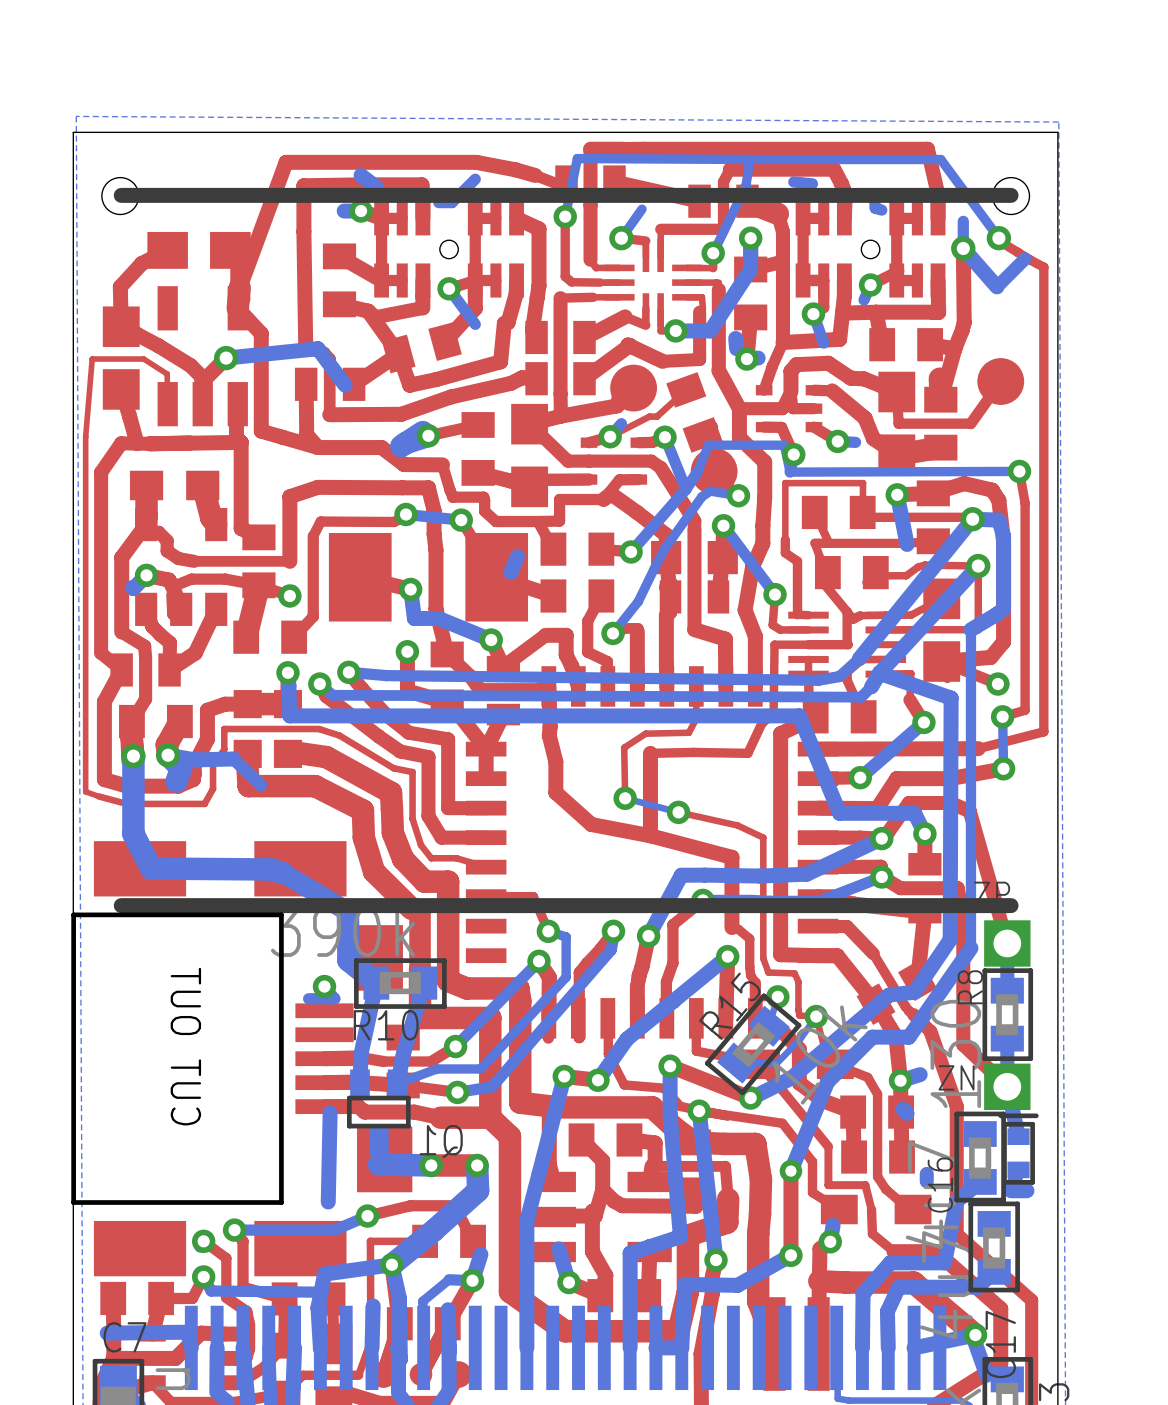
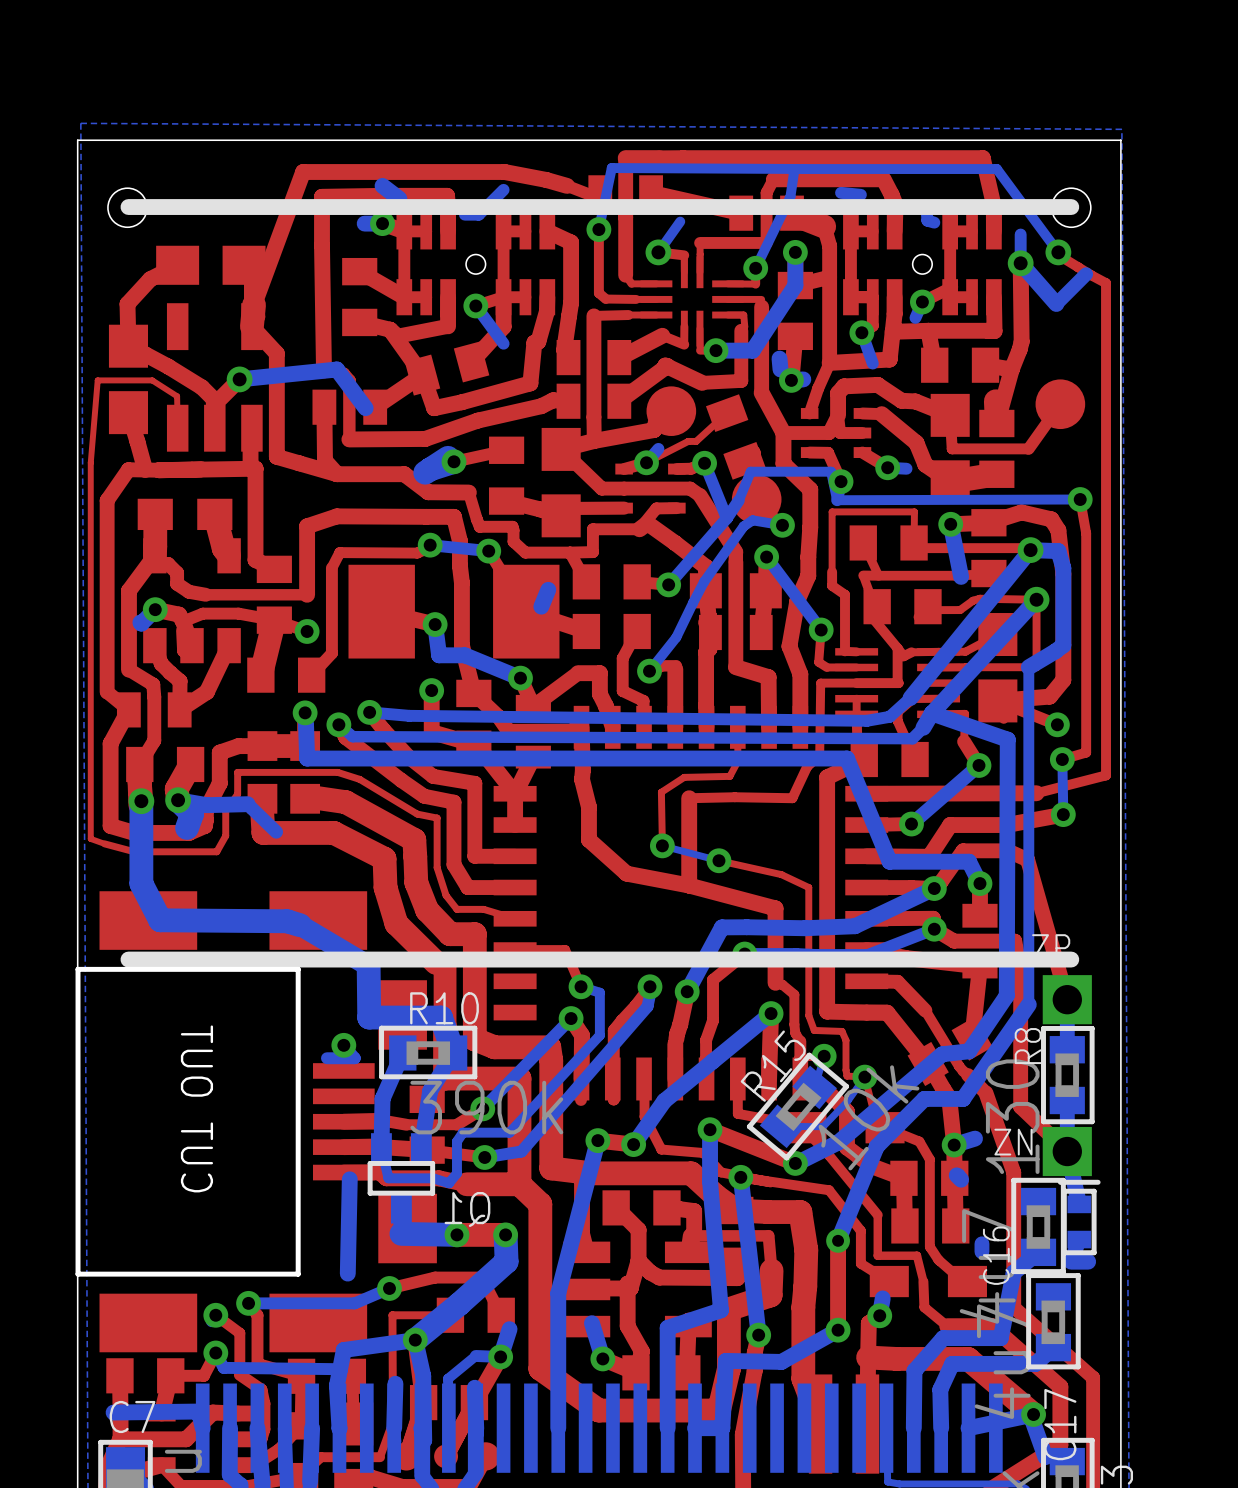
bottom track: (348, 960) (376, 983) (361, 1054) (360, 1083) -> (369, 1017) (440, 1017) (453, 1052) (430, 1090) (421, 1148)
R10 rotation: 0° (400, 983) -> 180° (428, 1052)
bottom track: (424, 983) (403, 1054) (397, 1083) (436, 1069) -> (402, 1052) (382, 1098) (381, 1148) (388, 1178) (433, 1178) (449, 1183) (456, 1173) (456, 1141) (462, 1132)

